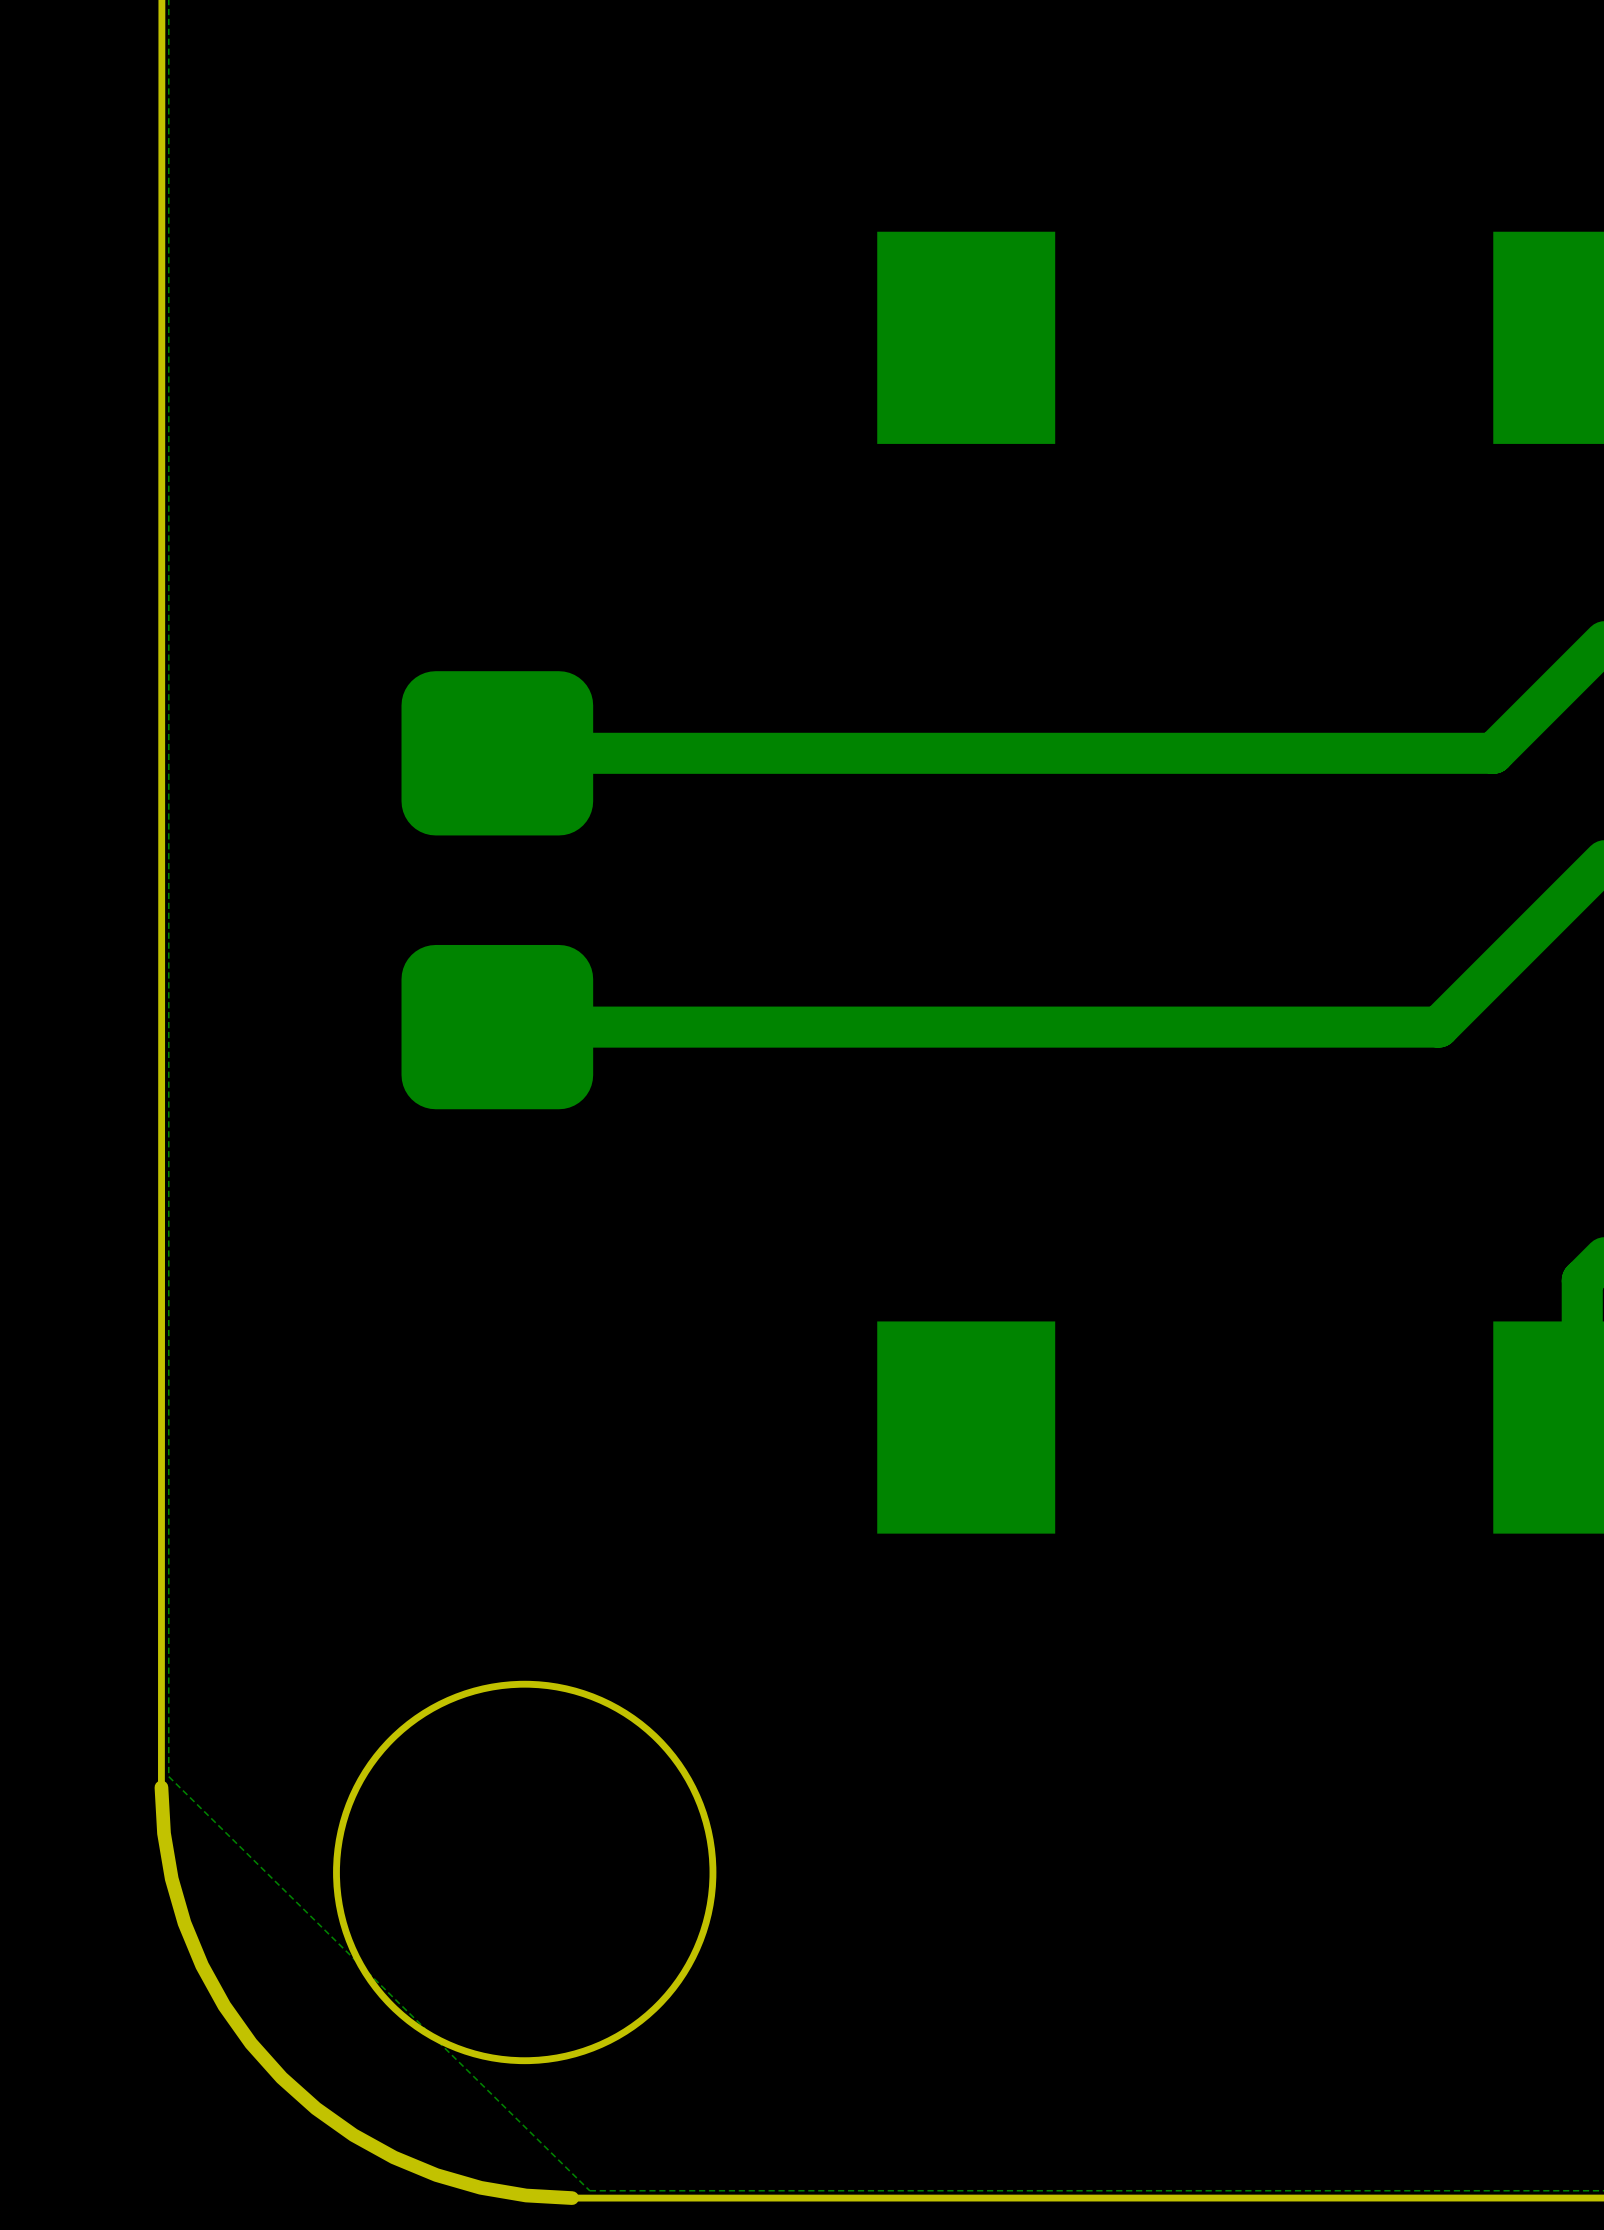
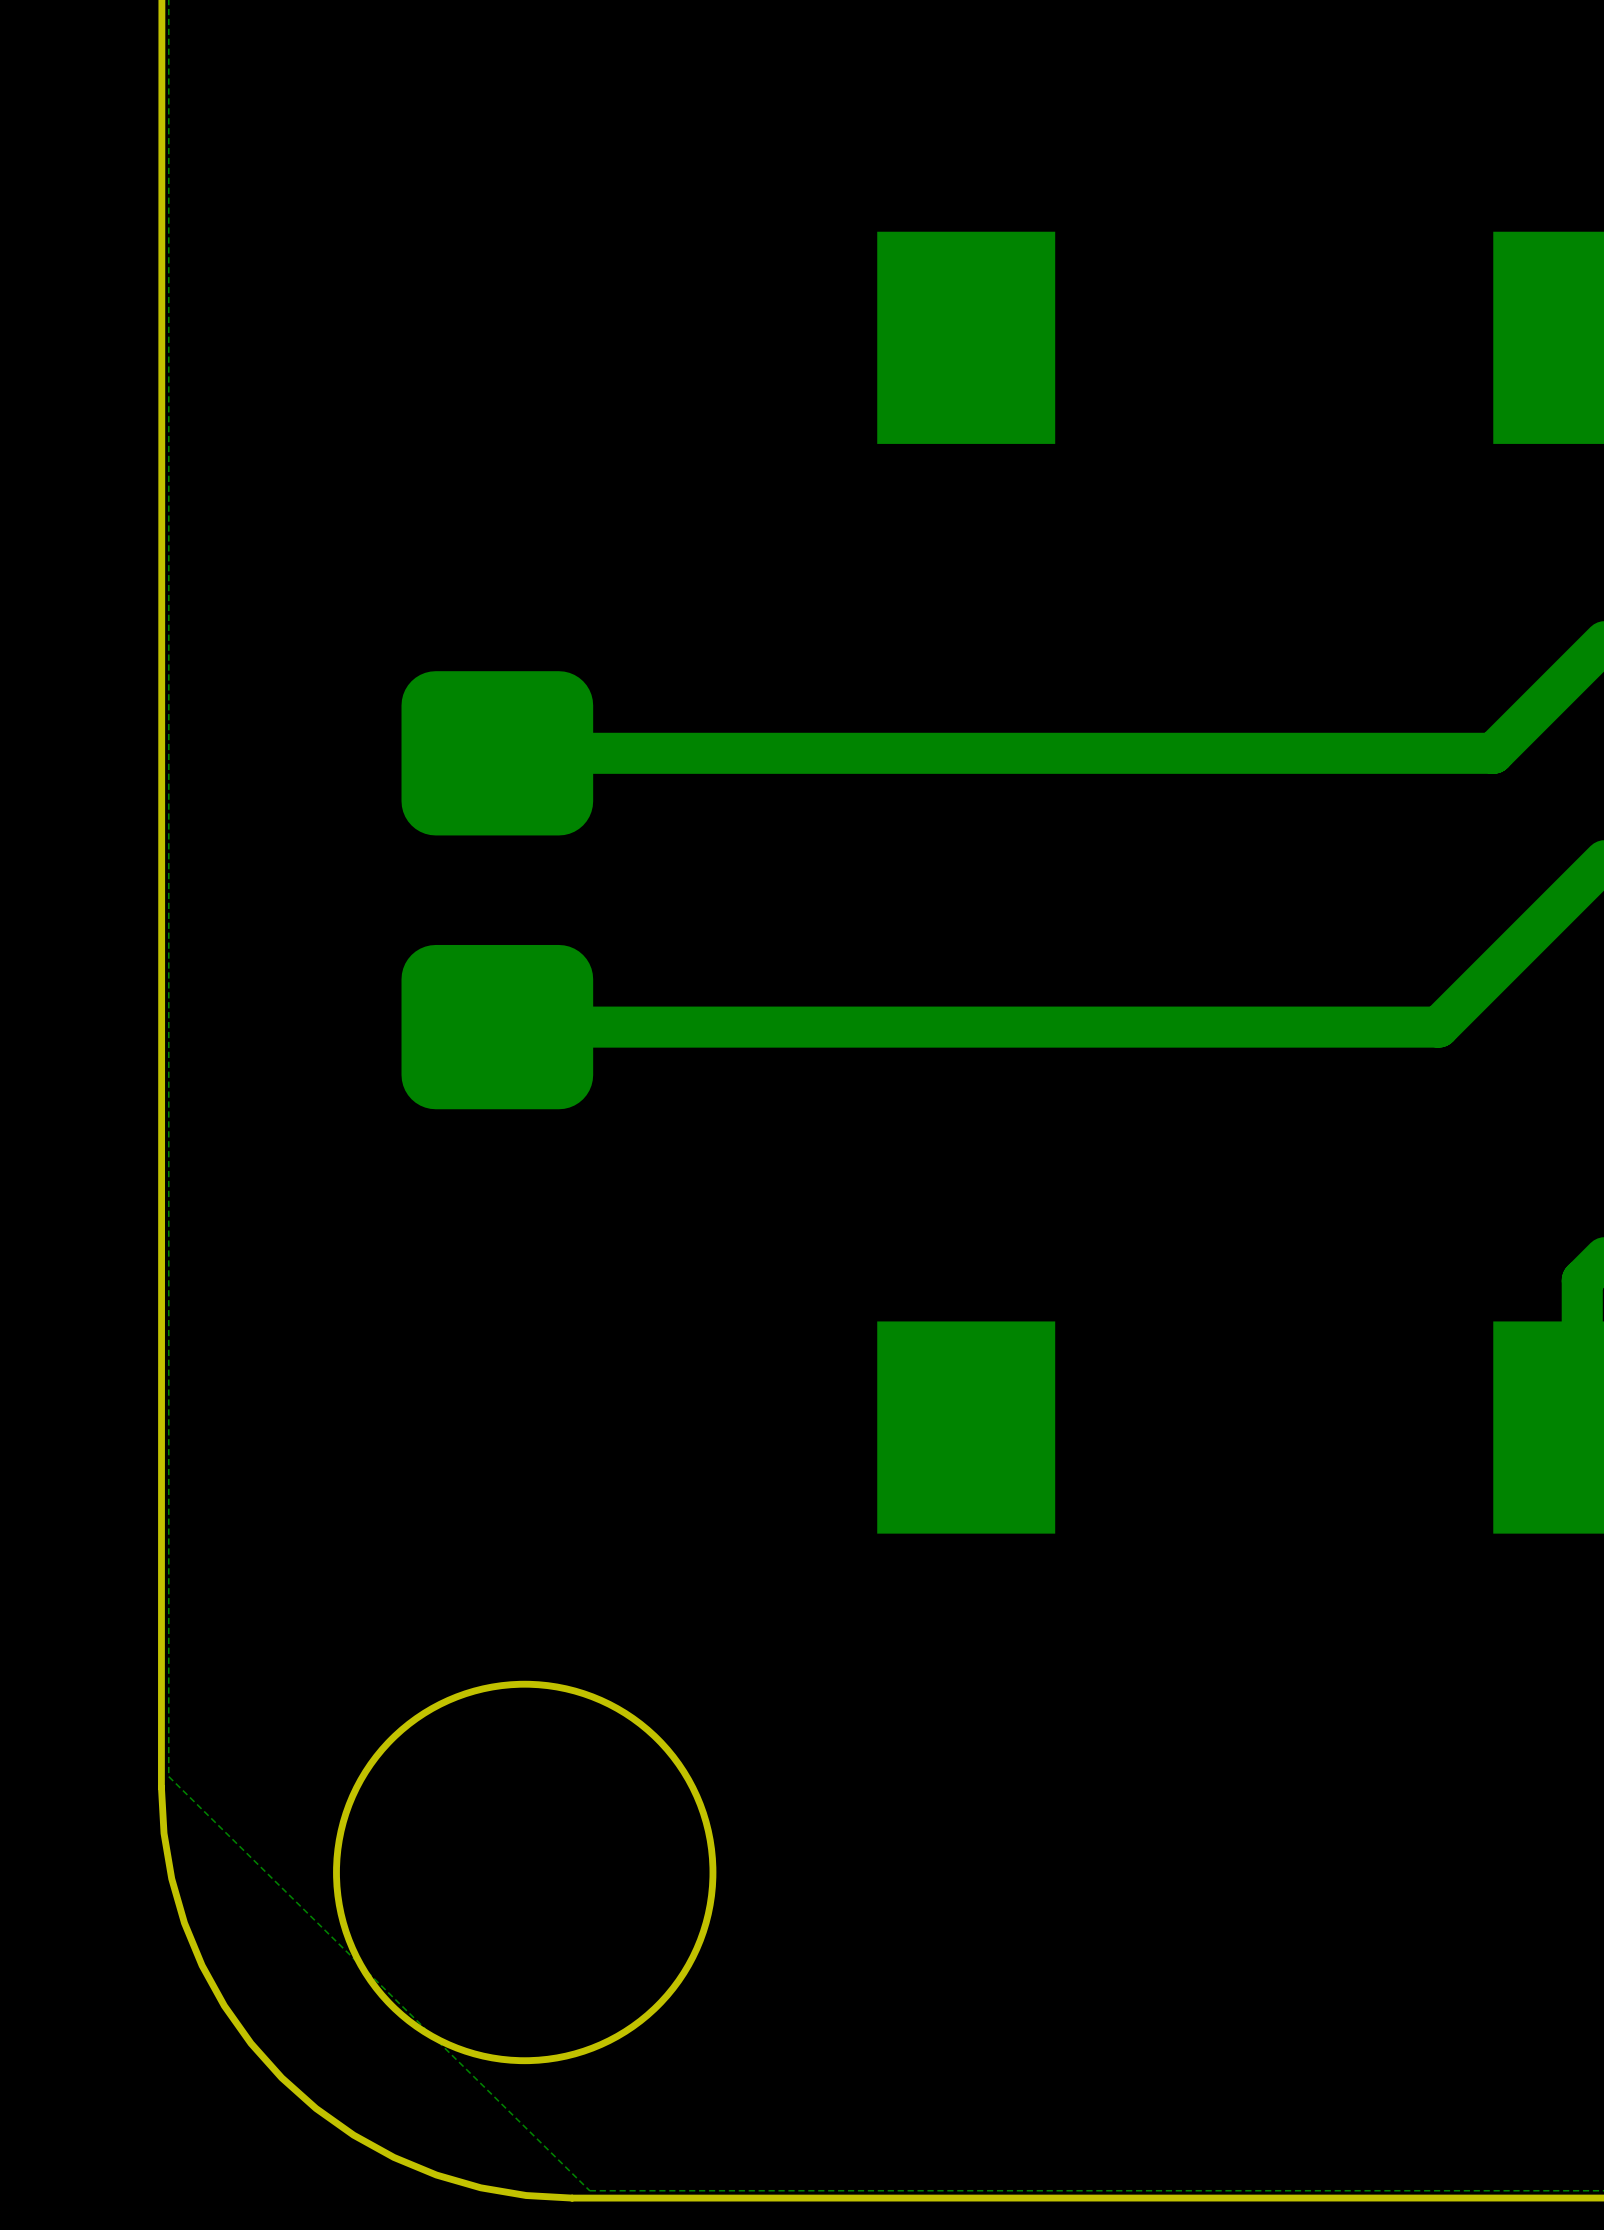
board edge width: thick (161, 1787) (164, 1833) (171, 1878) (184, 1923) (202, 1965) (224, 2005) (251, 2043) (281, 2077) (316, 2108) (353, 2135) (393, 2157) (436, 2175) (480, 2187) (526, 2195) (572, 2198) -> thin (161, 1787) (164, 1833) (171, 1878) (184, 1923) (202, 1965) (224, 2005) (251, 2043) (281, 2077) (316, 2108) (353, 2135) (393, 2157) (436, 2175) (480, 2187) (526, 2195) (572, 2198)

